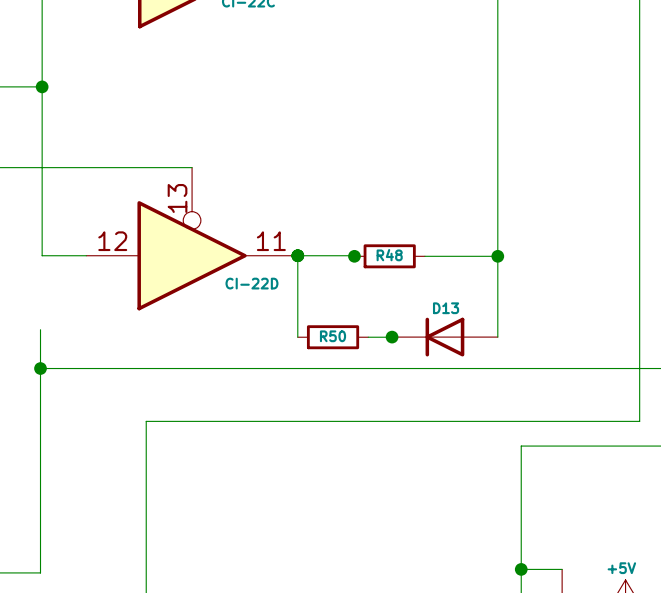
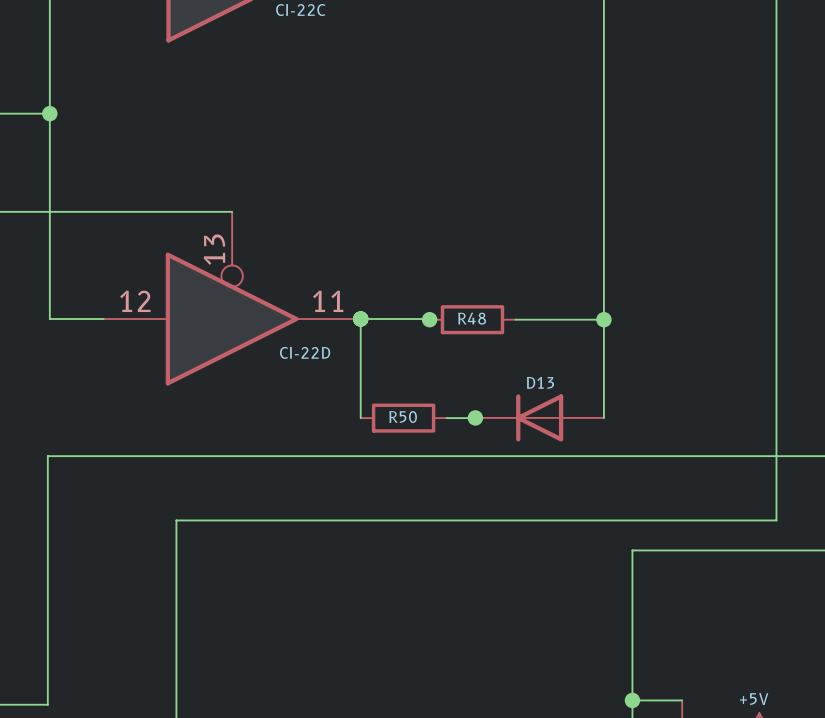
wire: (40, 329) (40, 368) -> none
junction: (40, 368) -> none

